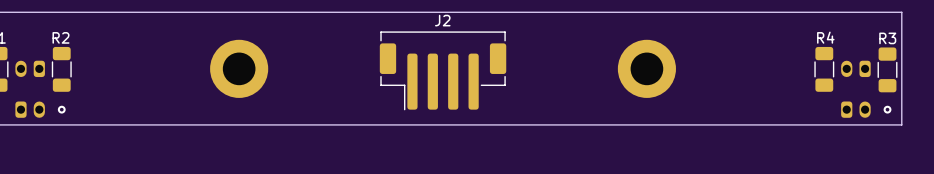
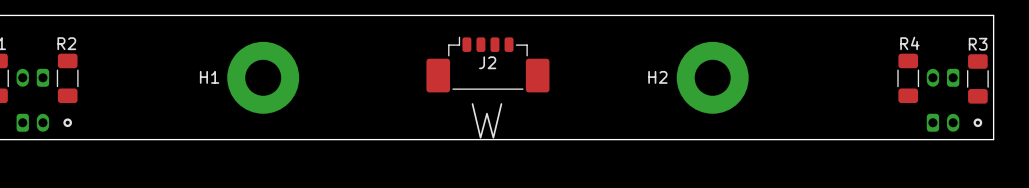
J2 name position: J2 (442, 20) -> J2 (487, 62)
J2 footprint: [379, 31, 507, 111] -> [426, 36, 550, 93]
part: (239, 68) -> none
H1: none -> (263, 77)
part: (646, 68) -> none
H2: none -> (712, 77)
text: none -> W (486, 120)

